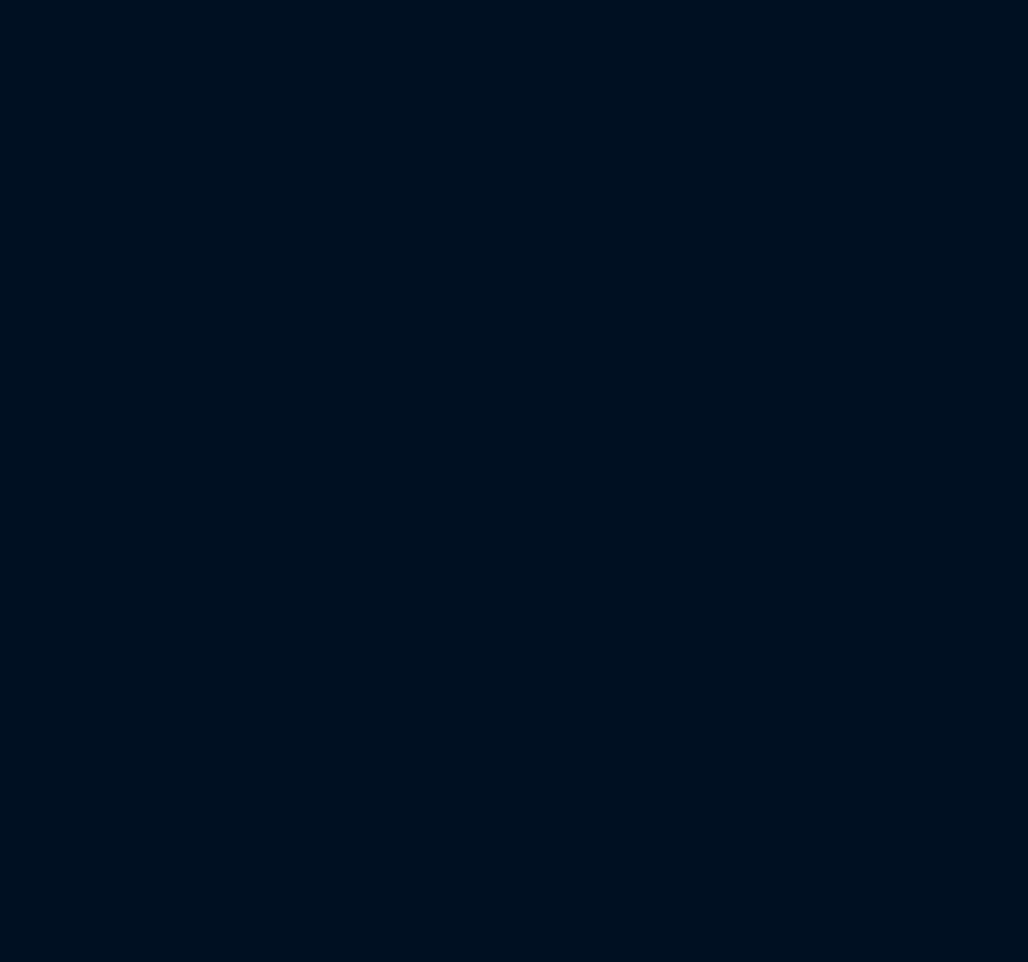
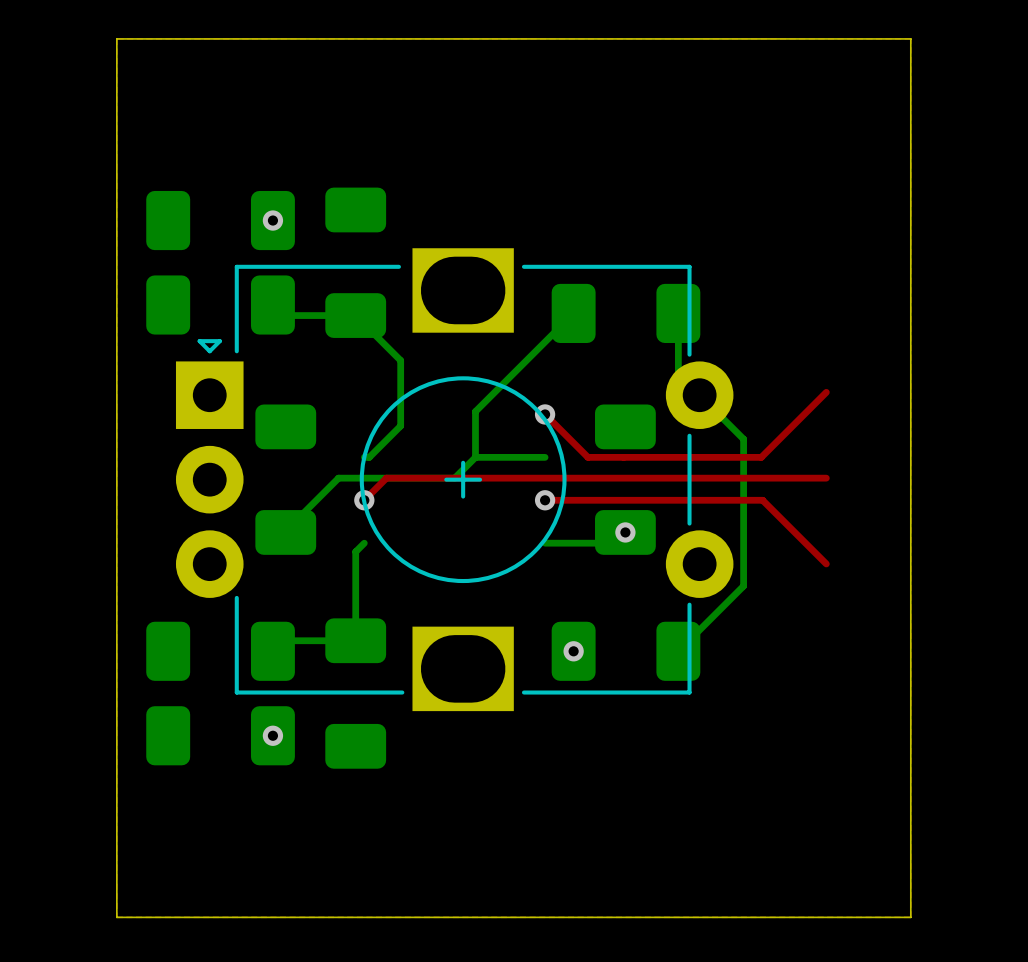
board edge: none -> (116, 38) (910, 38) (910, 917) (116, 917) (116, 38)
part: none -> (220, 220)
via: none -> (272, 220)
part: none -> (355, 262)
part: none -> (220, 304)
bottom track: none -> (272, 304) (283, 315) (355, 315) (400, 360) (400, 425) (369, 457) (364, 457)
bottom track: none -> (573, 313) (475, 411) (475, 457)
part: none -> (626, 313)
bottom track: none -> (678, 313) (678, 373) (743, 439) (743, 586) (678, 651)
top track: none -> (826, 392) (761, 457) (587, 457) (545, 414)
via: none -> (545, 414)
bottom track: none -> (475, 457) (454, 478) (338, 478) (285, 532)
bottom track: none -> (475, 457) (545, 457)
top track: none -> (826, 478) (386, 478) (364, 500)
part: none -> (285, 479)
part: none -> (454, 479)
part: none -> (625, 479)
via: none -> (364, 500)
top track: none -> (545, 500) (762, 500) (826, 563)
via: none -> (545, 500)
bottom track: none -> (625, 532) (614, 543) (545, 543)
via: none -> (625, 532)
bottom track: none -> (364, 543) (355, 551) (355, 640) (283, 640) (272, 651)
part: none -> (220, 651)
via: none -> (573, 651)
part: none -> (626, 651)
part: none -> (355, 693)
part: none -> (220, 735)
via: none -> (272, 735)

